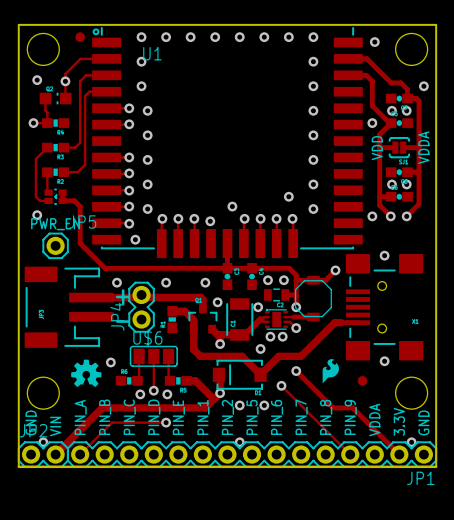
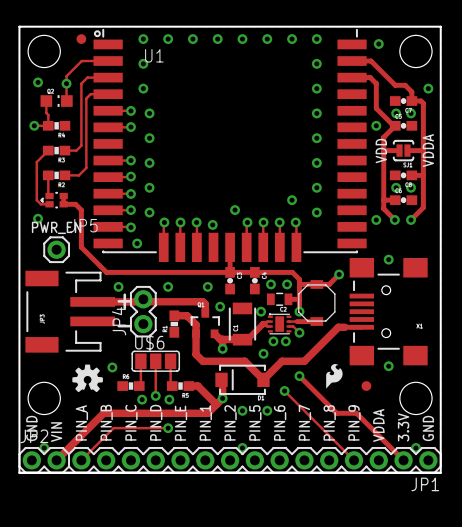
part footprint: [44, 188, 67, 205] -> [40, 191, 68, 209]

